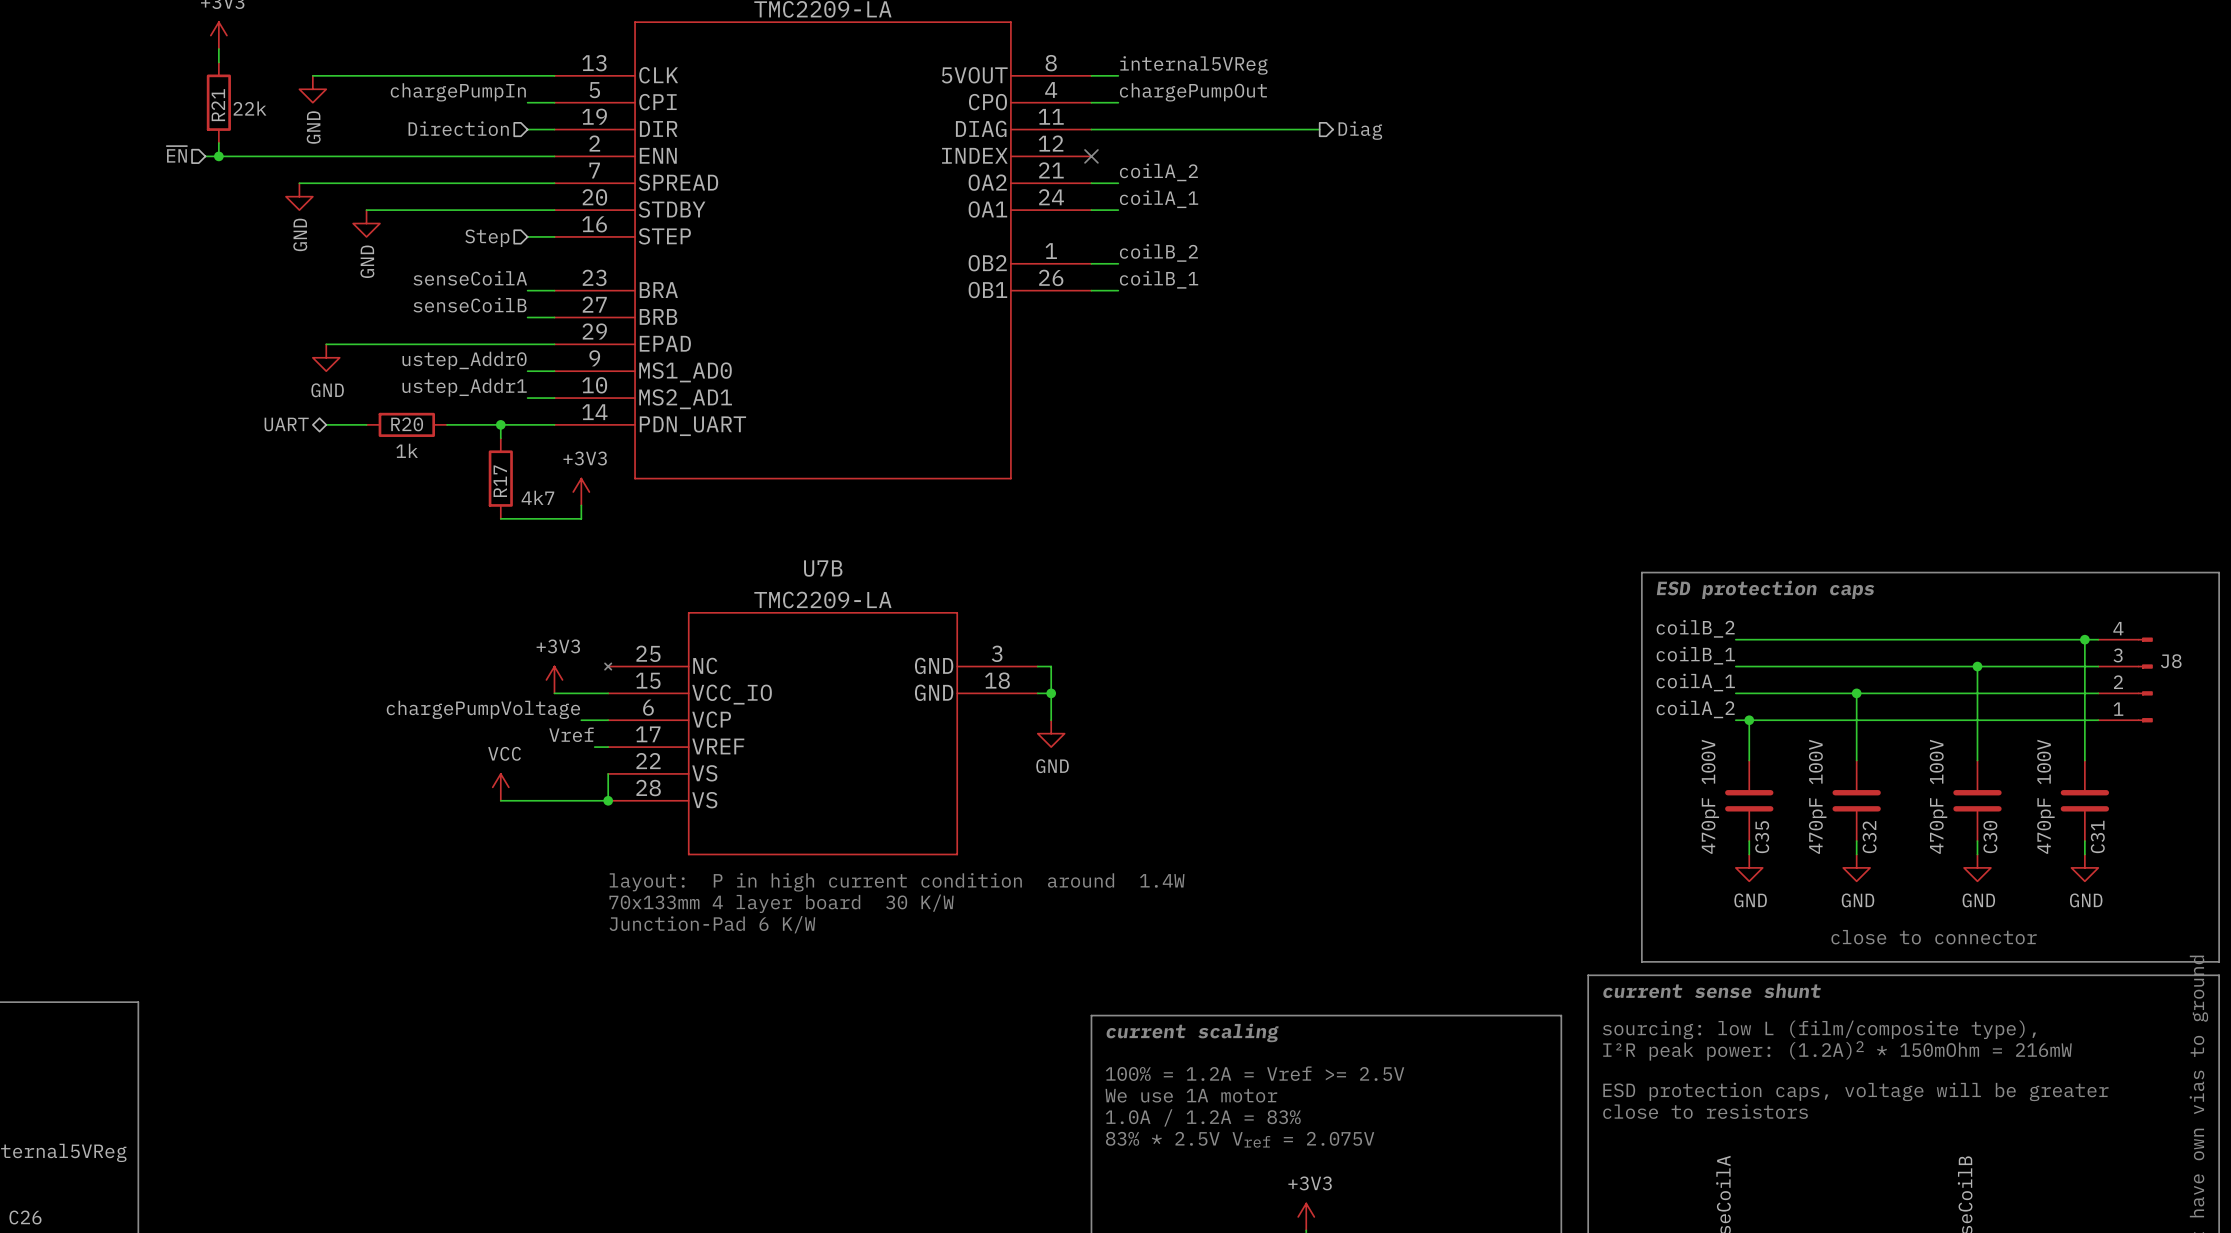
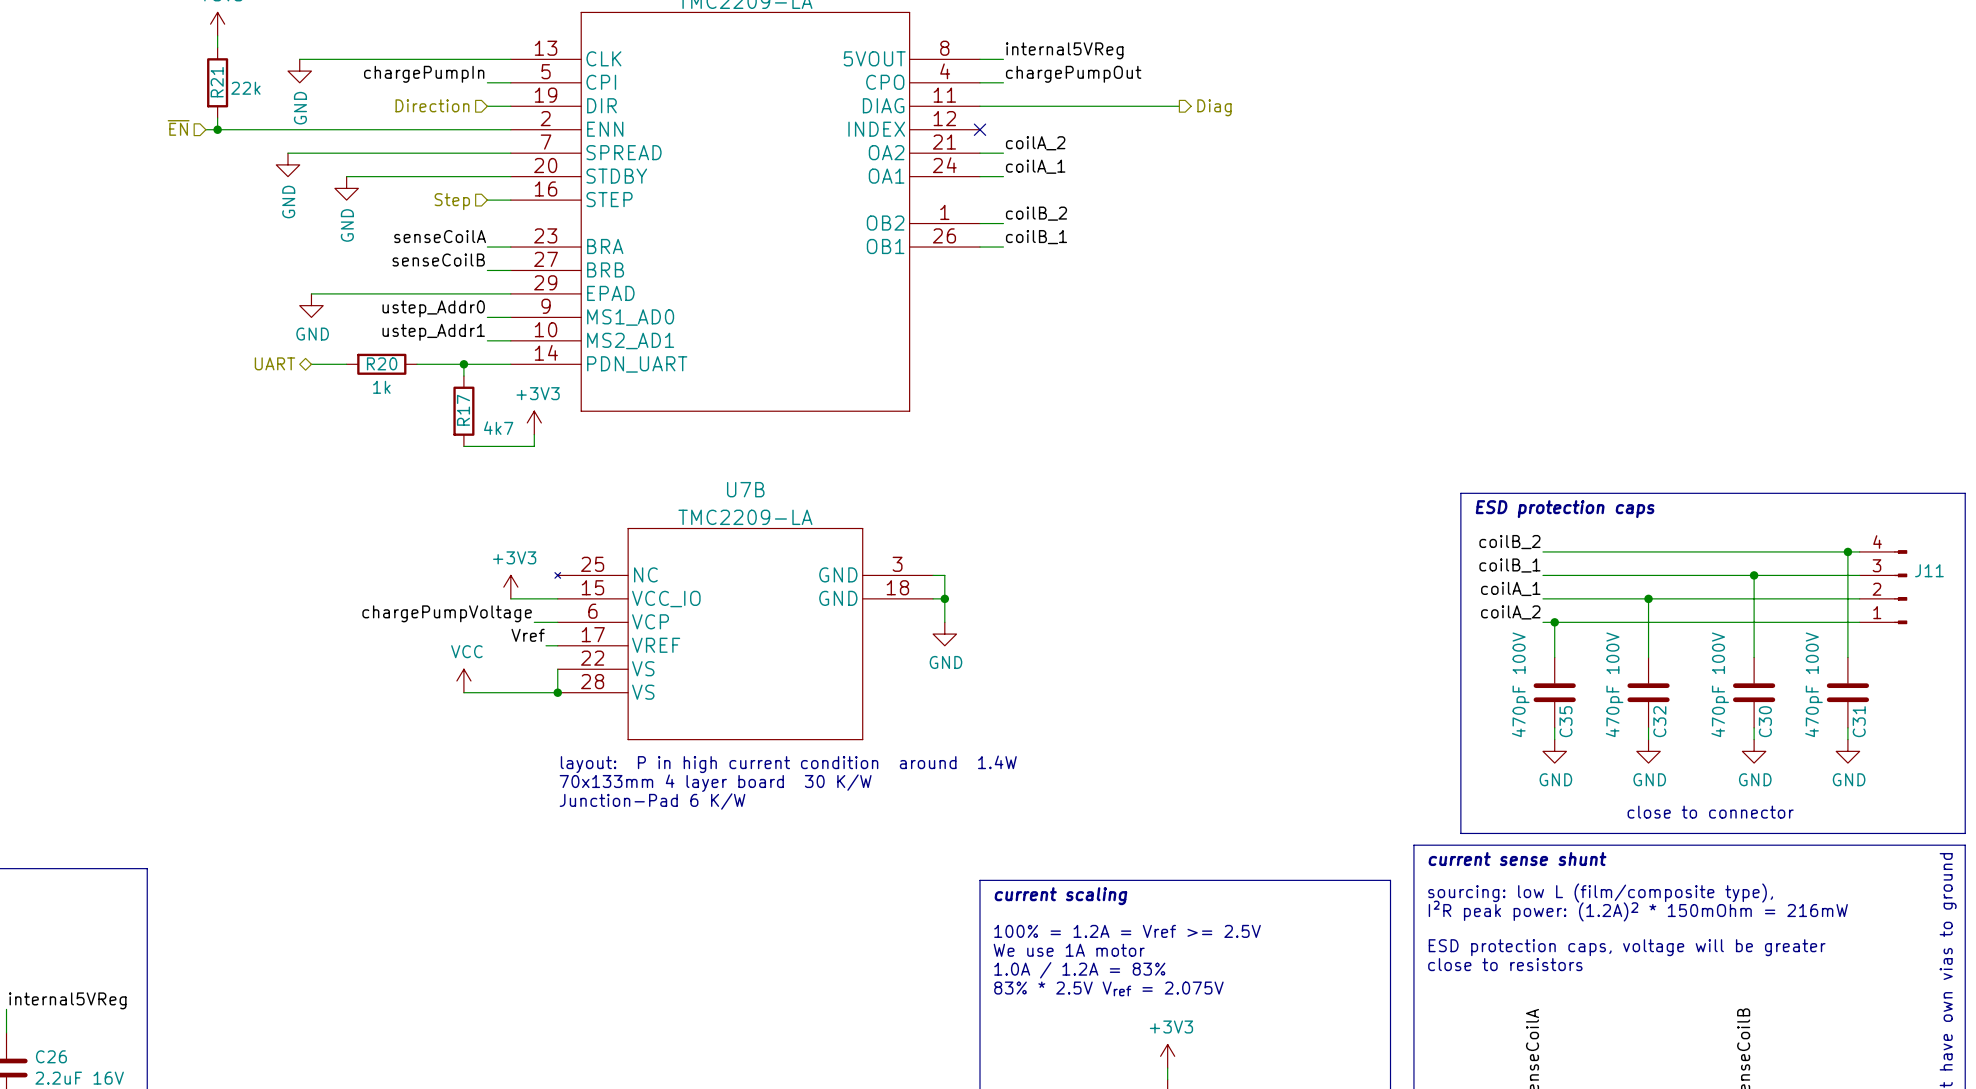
J8 name: J8 (2171, 661) -> J11 (1929, 570)

